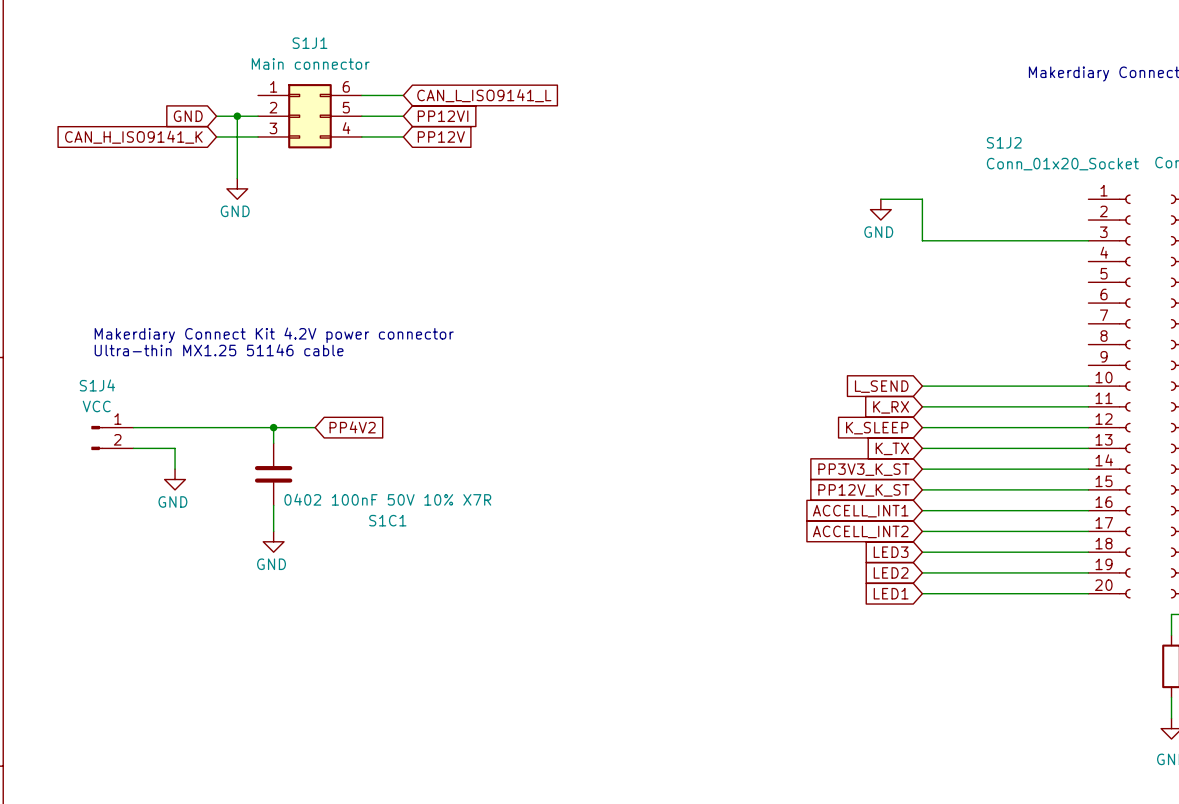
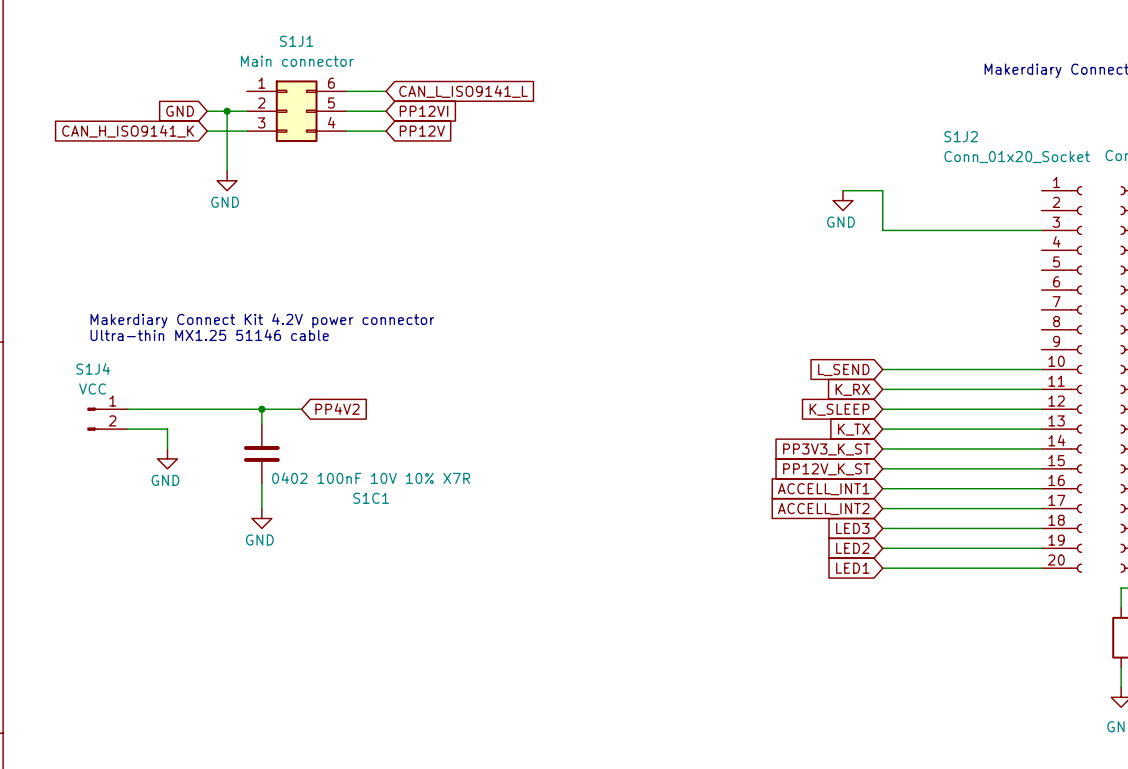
S1C1 value: 0402 100nF 50V 10% X7R (387, 499) -> 0402 100nF 10V 10% X7R (371, 478)

